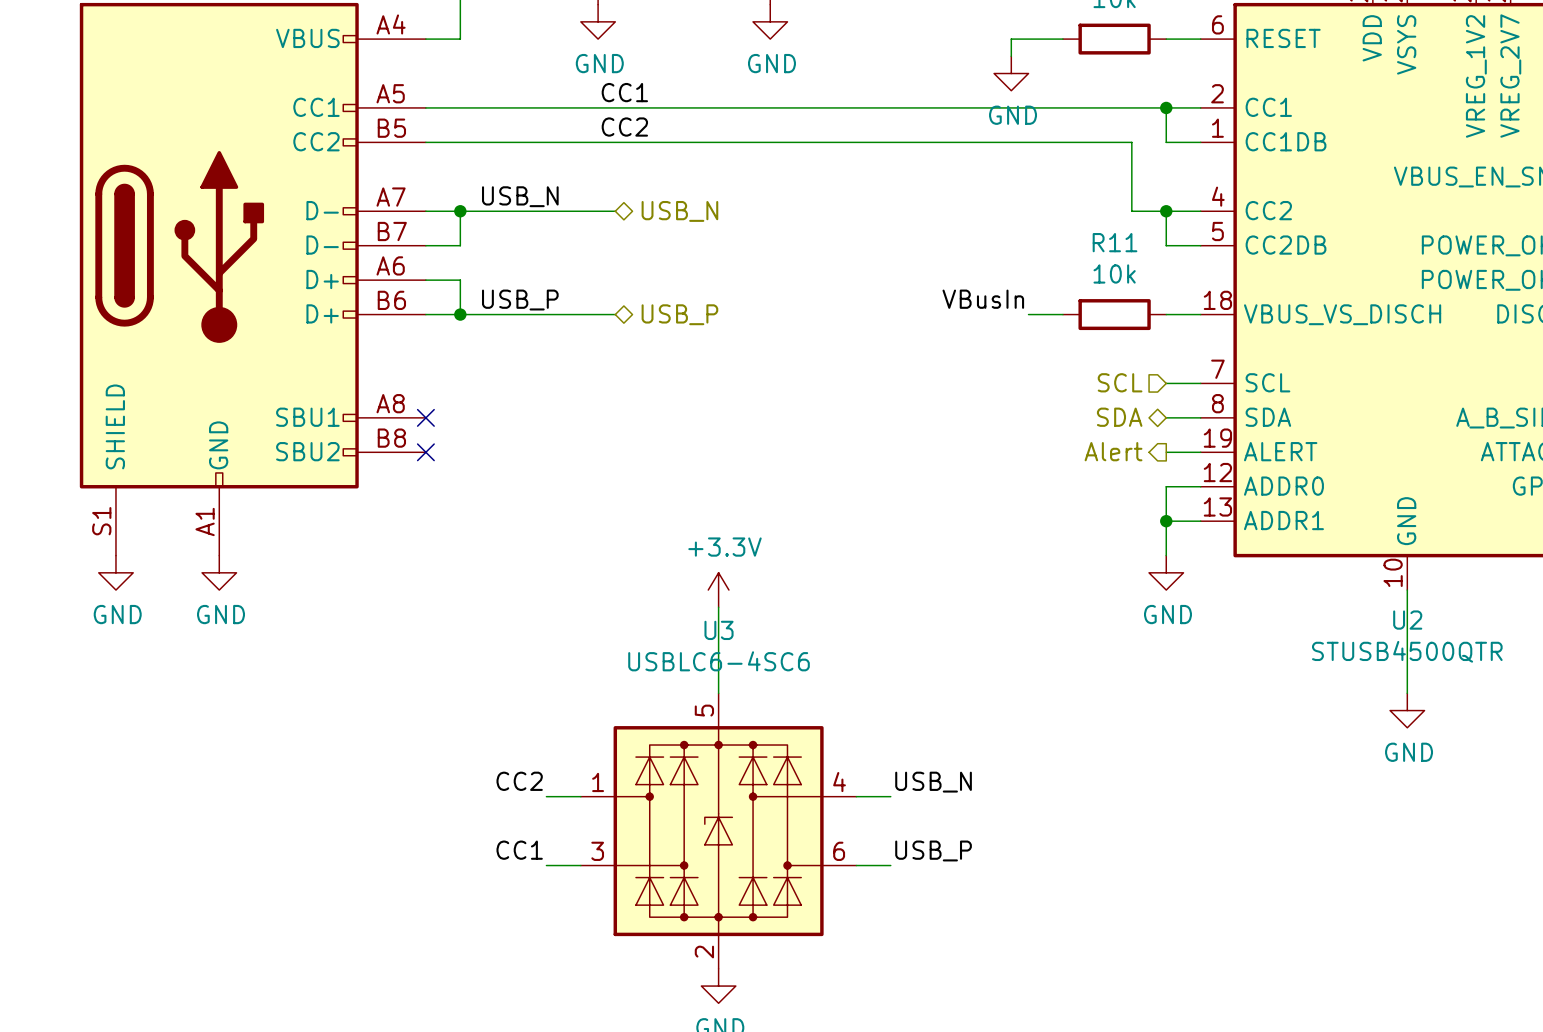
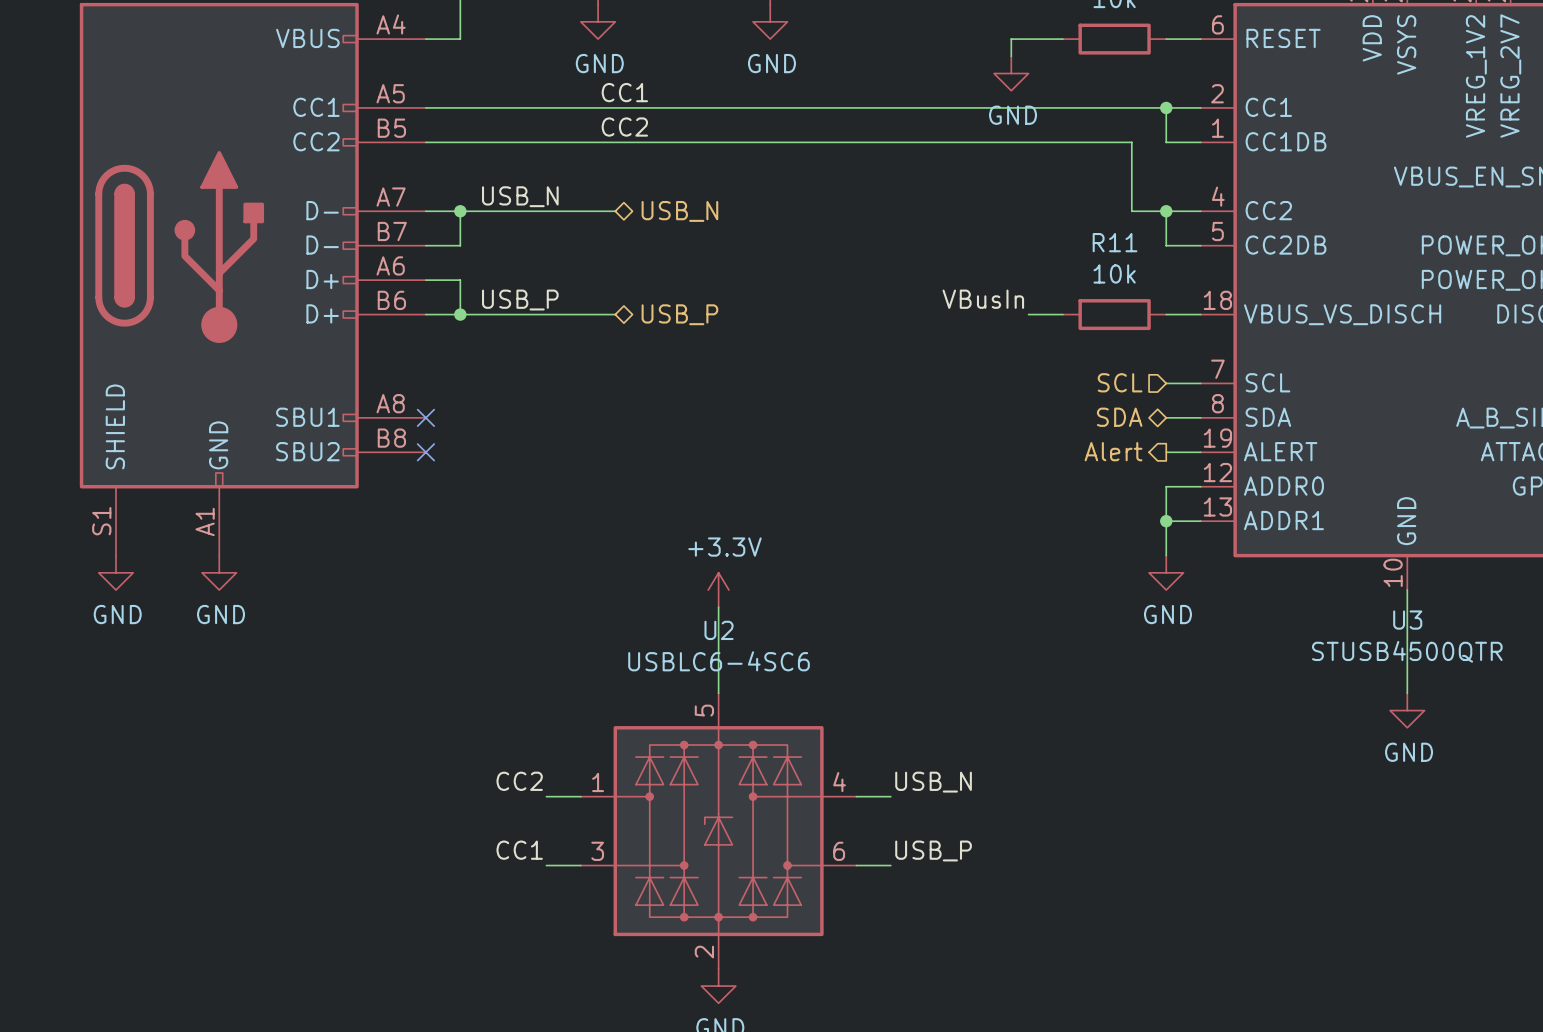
U2 name: U2 (1407, 620) -> U3 (1407, 620)
U3 name: U3 (719, 630) -> U2 (719, 630)

